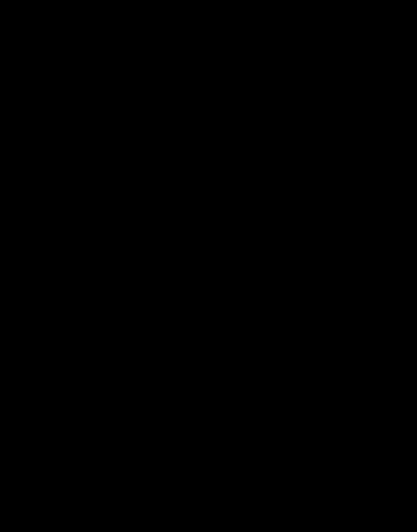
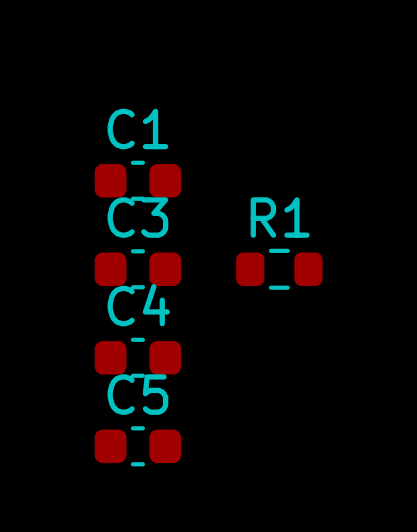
C1: none -> (137, 180)
C3: none -> (137, 269)
R1: none -> (279, 269)
C4: none -> (137, 357)
C5: none -> (137, 446)

